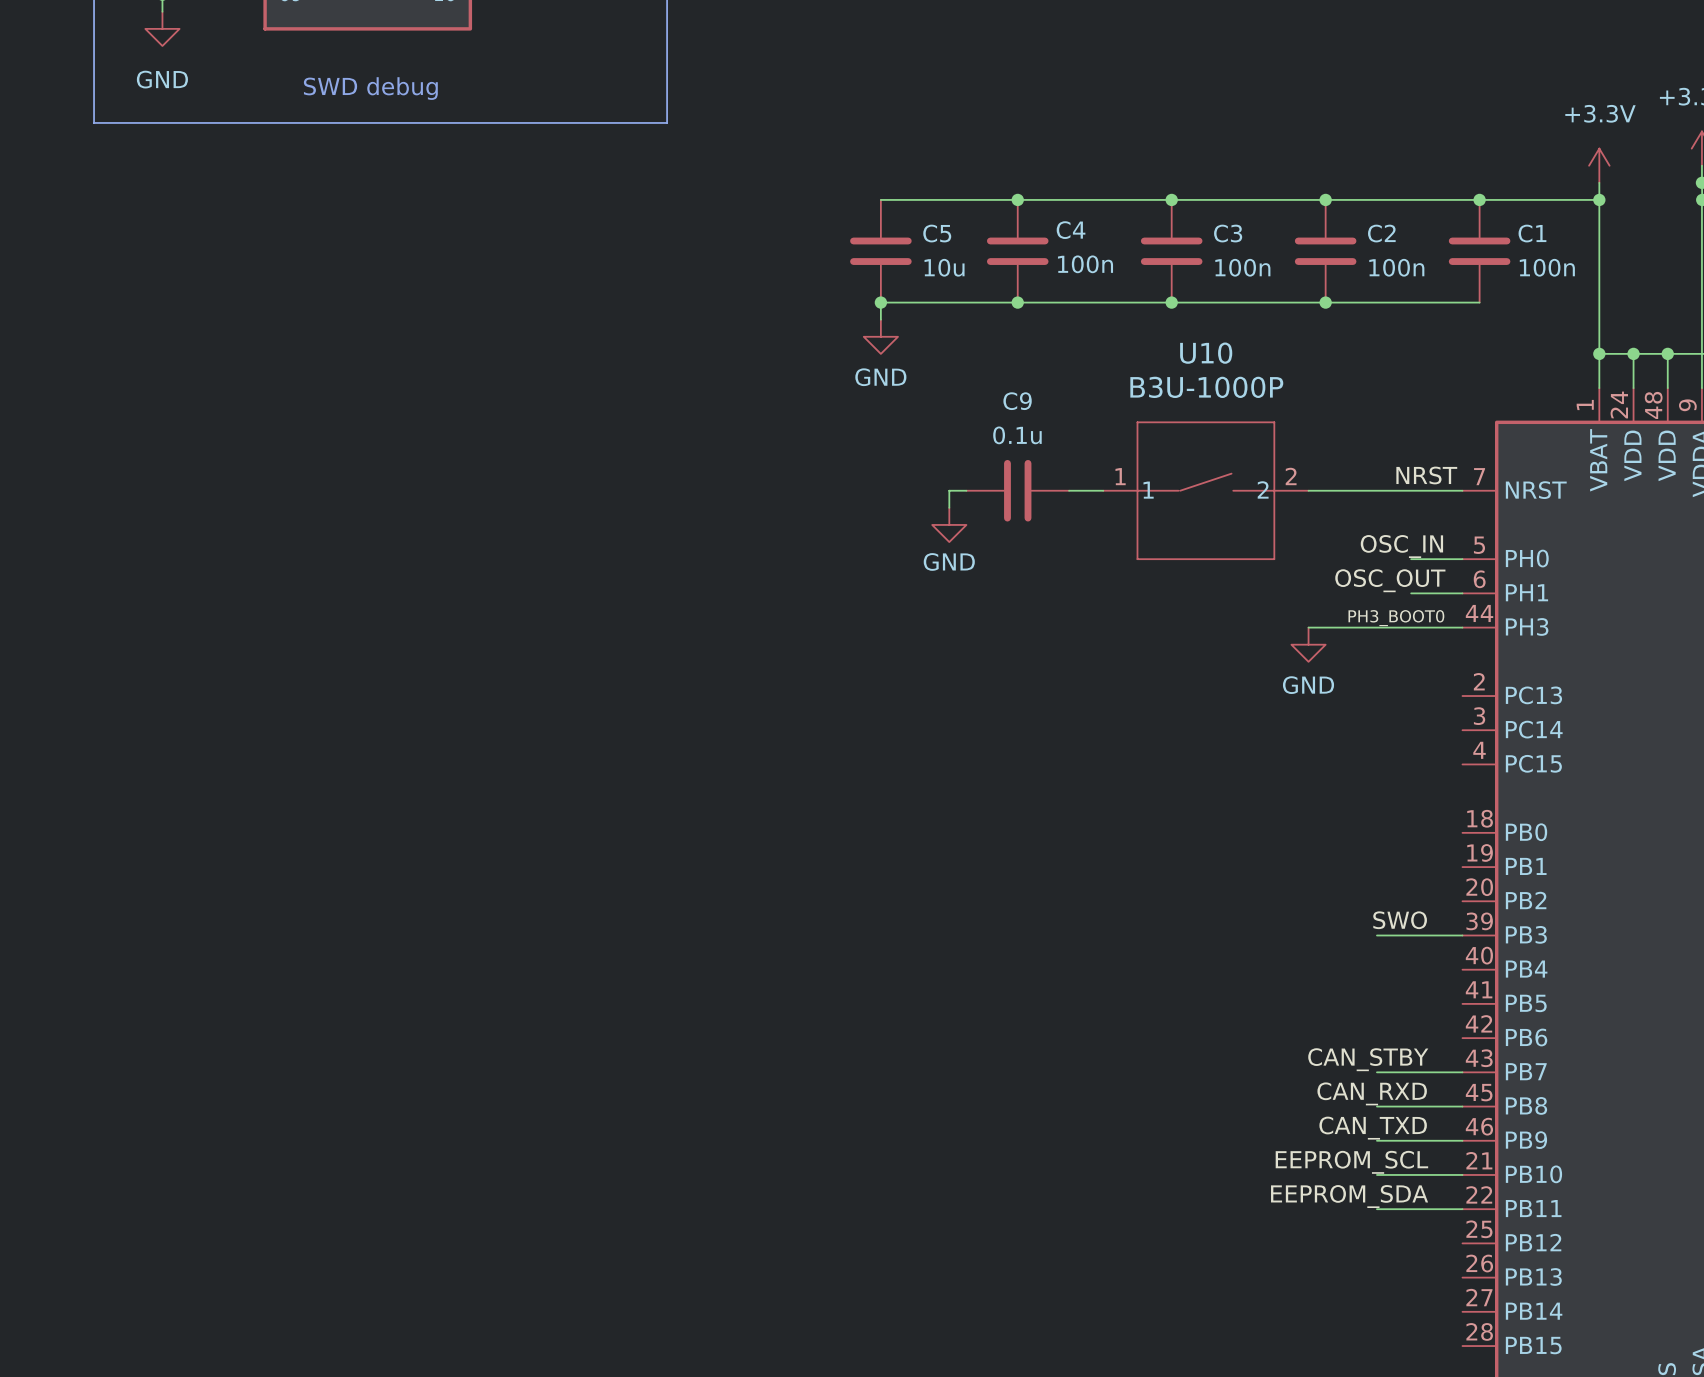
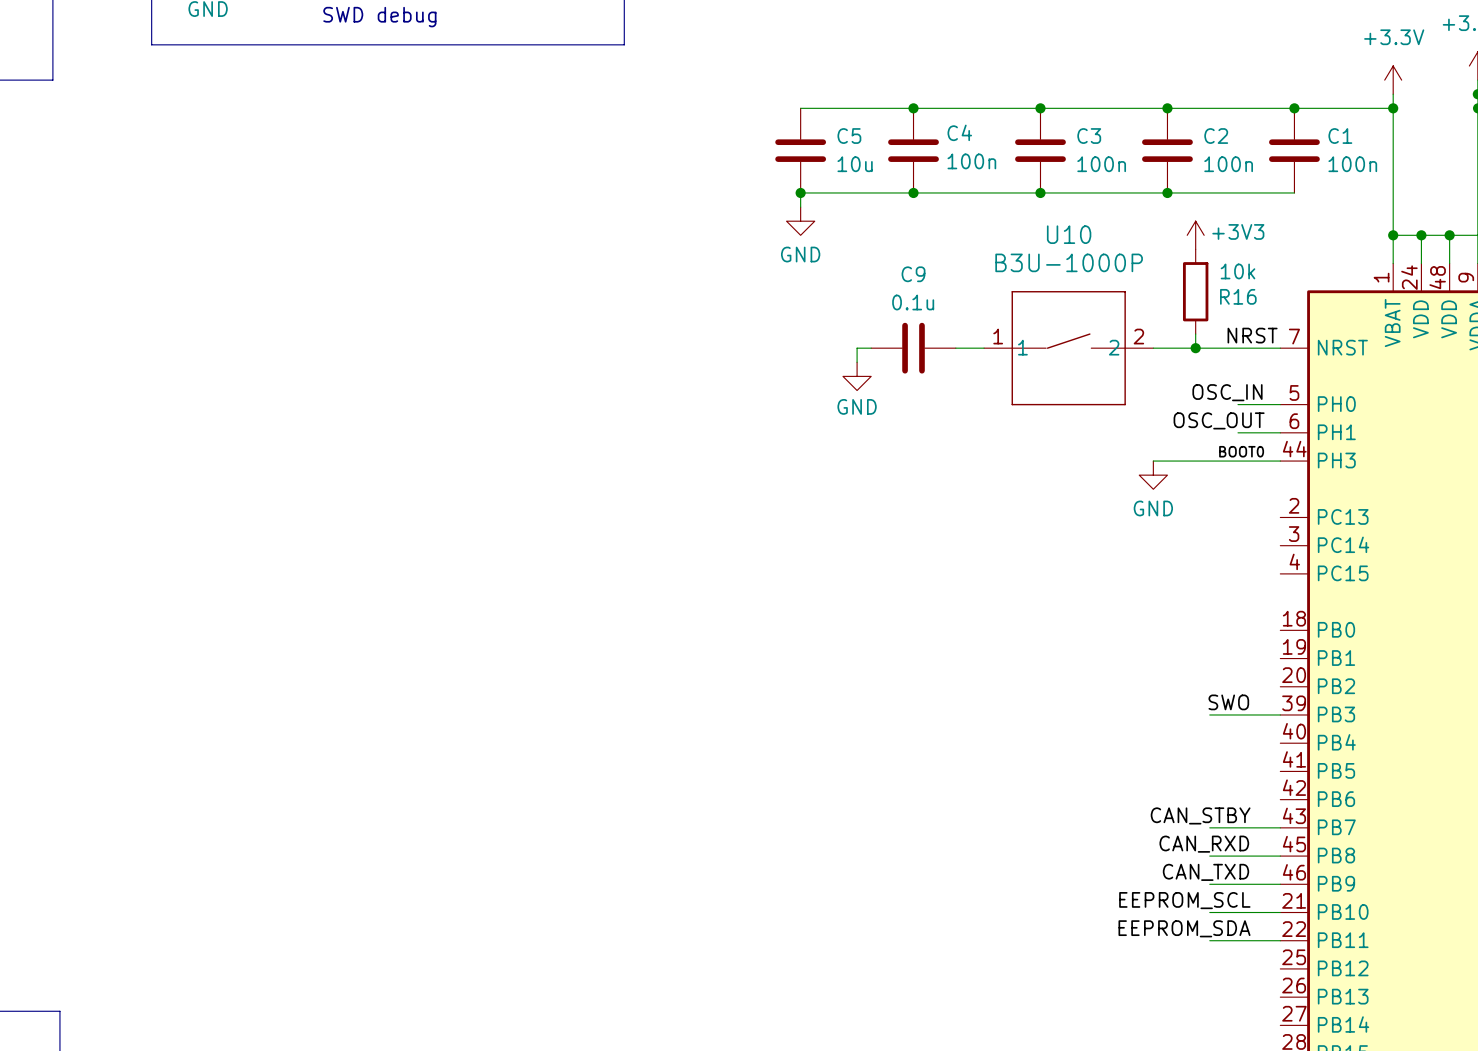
power symbol: none -> +3V3 (1195, 235)
R16: none -> 10k (1195, 291)
wire: none -> (1195, 334) (1195, 348)
junction: none -> (1195, 348)
label: PH3_BOOT0 (1396, 618) -> BOOT0 (1241, 451)

